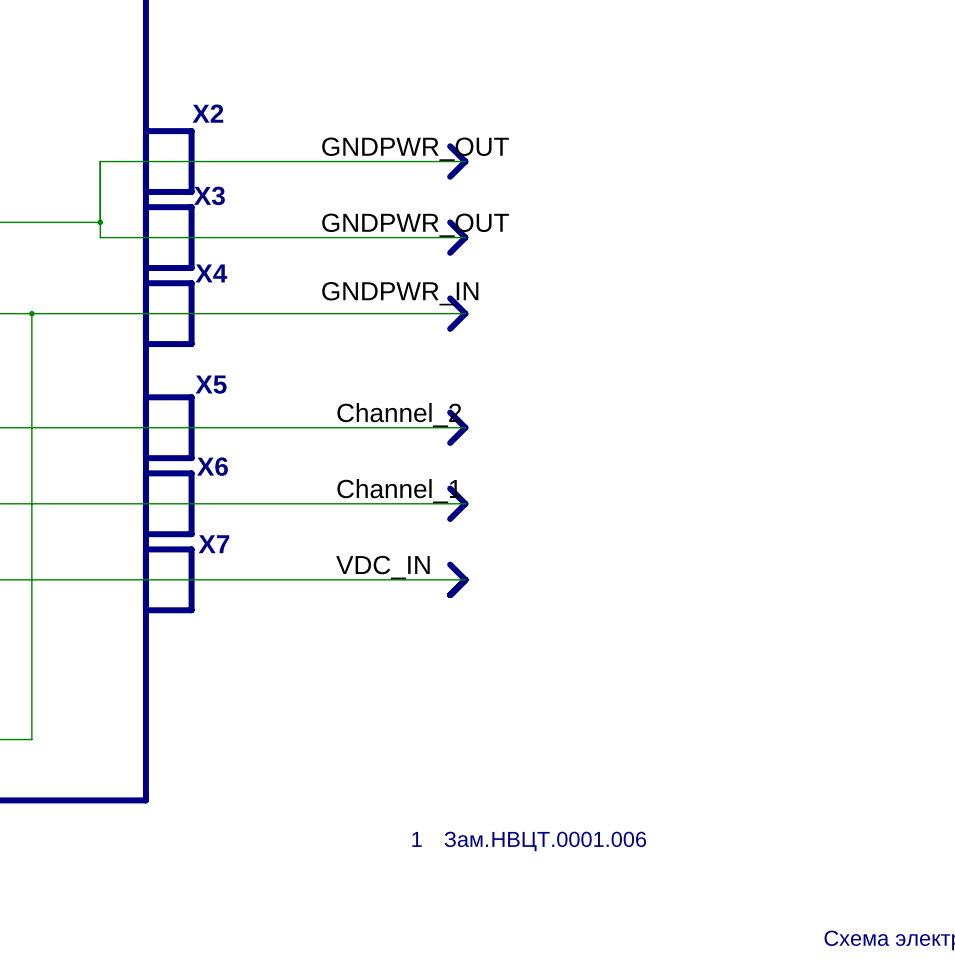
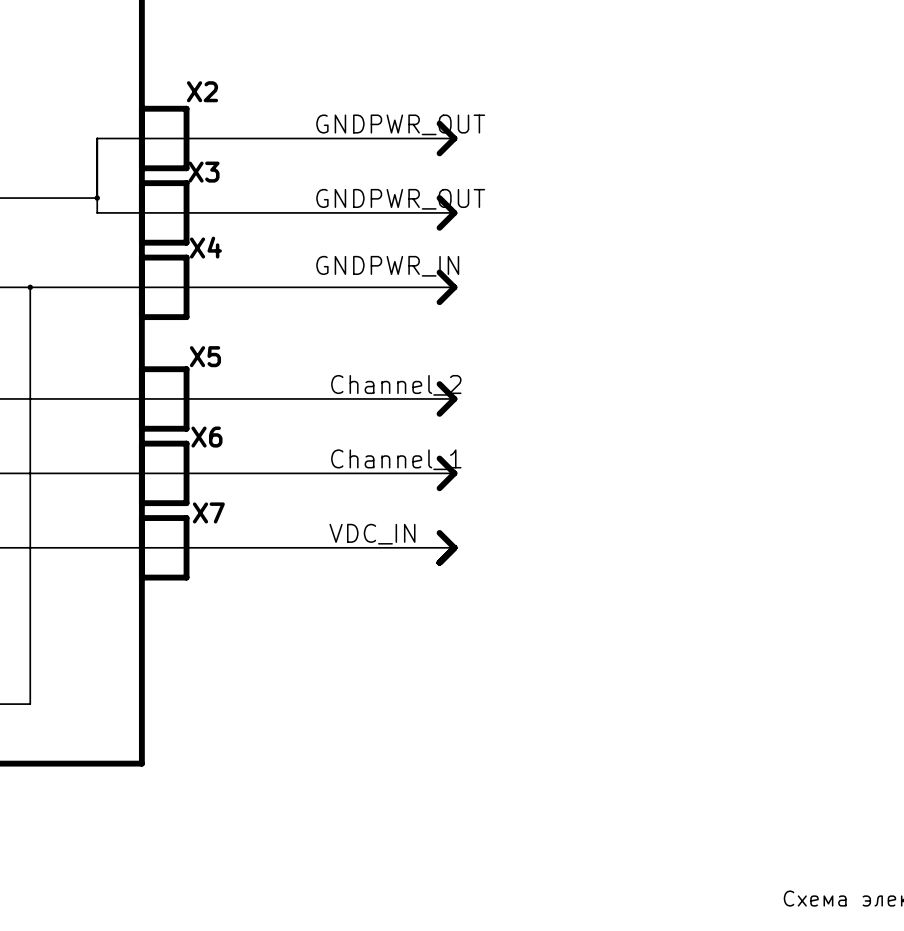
text: 1 (417, 839) -> none
text: Зам. (466, 839) -> none
text: НВЦТ.0001.006 (569, 841) -> none

